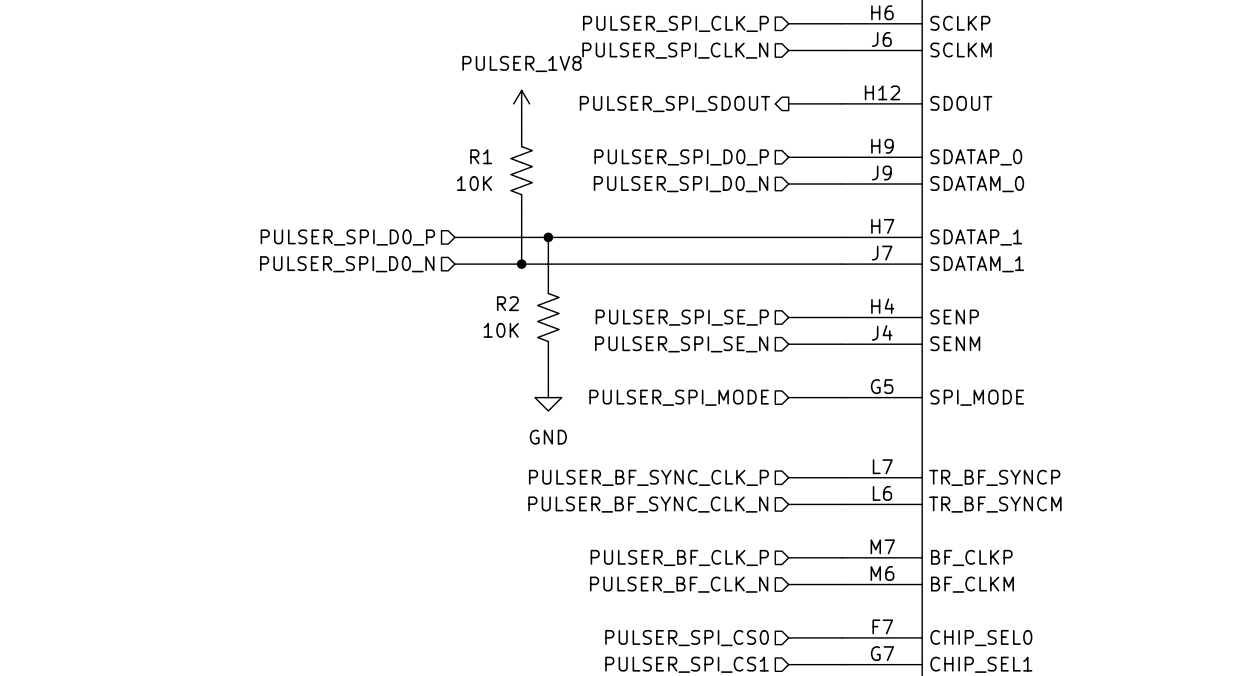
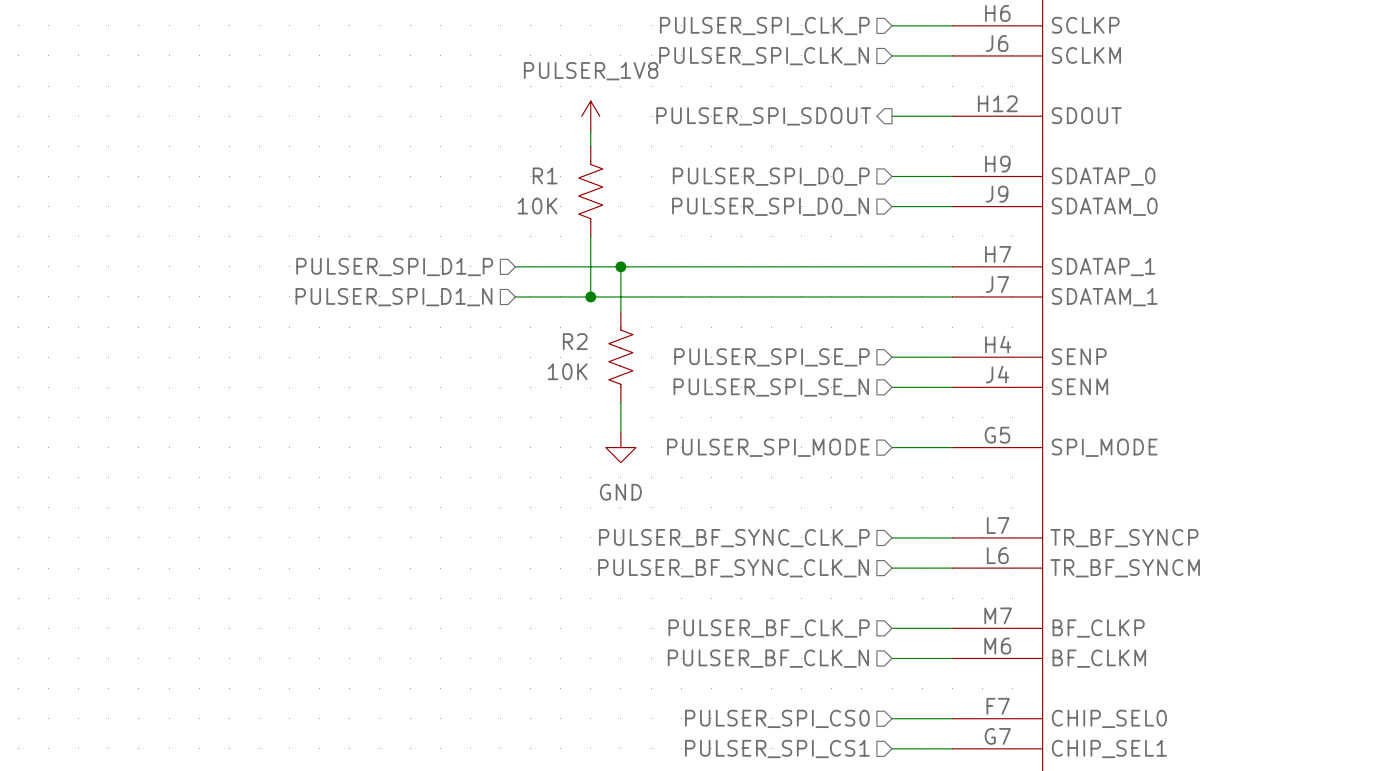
hierarchical label: PULSER_SPI_D0_P (347, 237) -> PULSER_SPI_D1_P (394, 267)
hierarchical label: PULSER_SPI_D0_N (347, 264) -> PULSER_SPI_D1_N (393, 297)

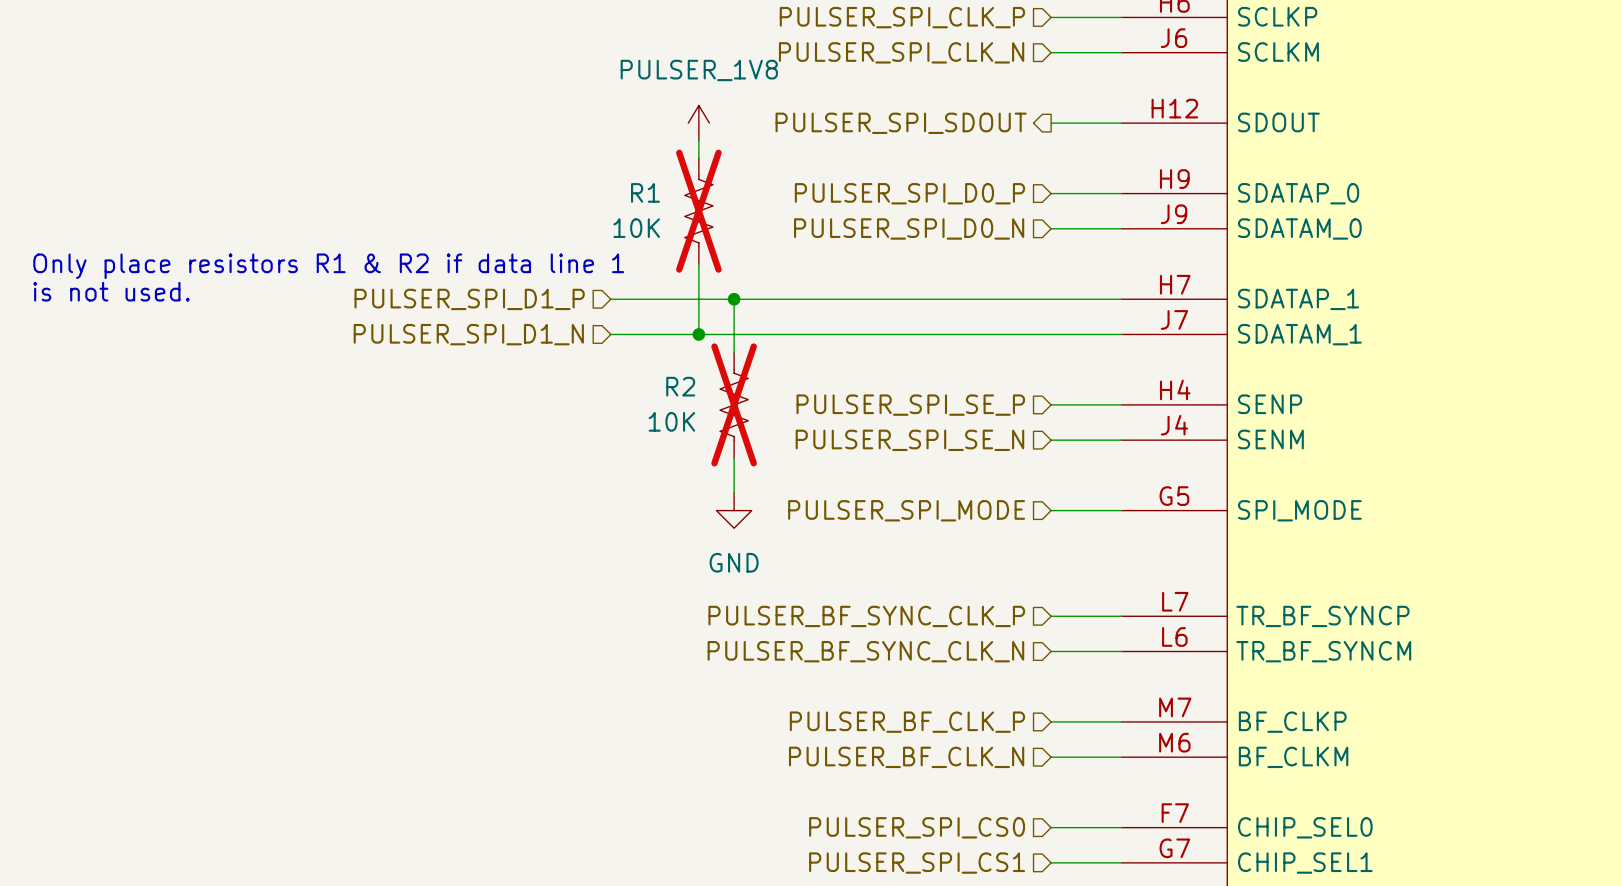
R1 do-not-place cross: none -> (698, 211)
text: none -> Only place resistors R1 & R2 if data line 1 (328, 266)
text: none -> is not used. (111, 291)
R2 do-not-place cross: none -> (734, 404)

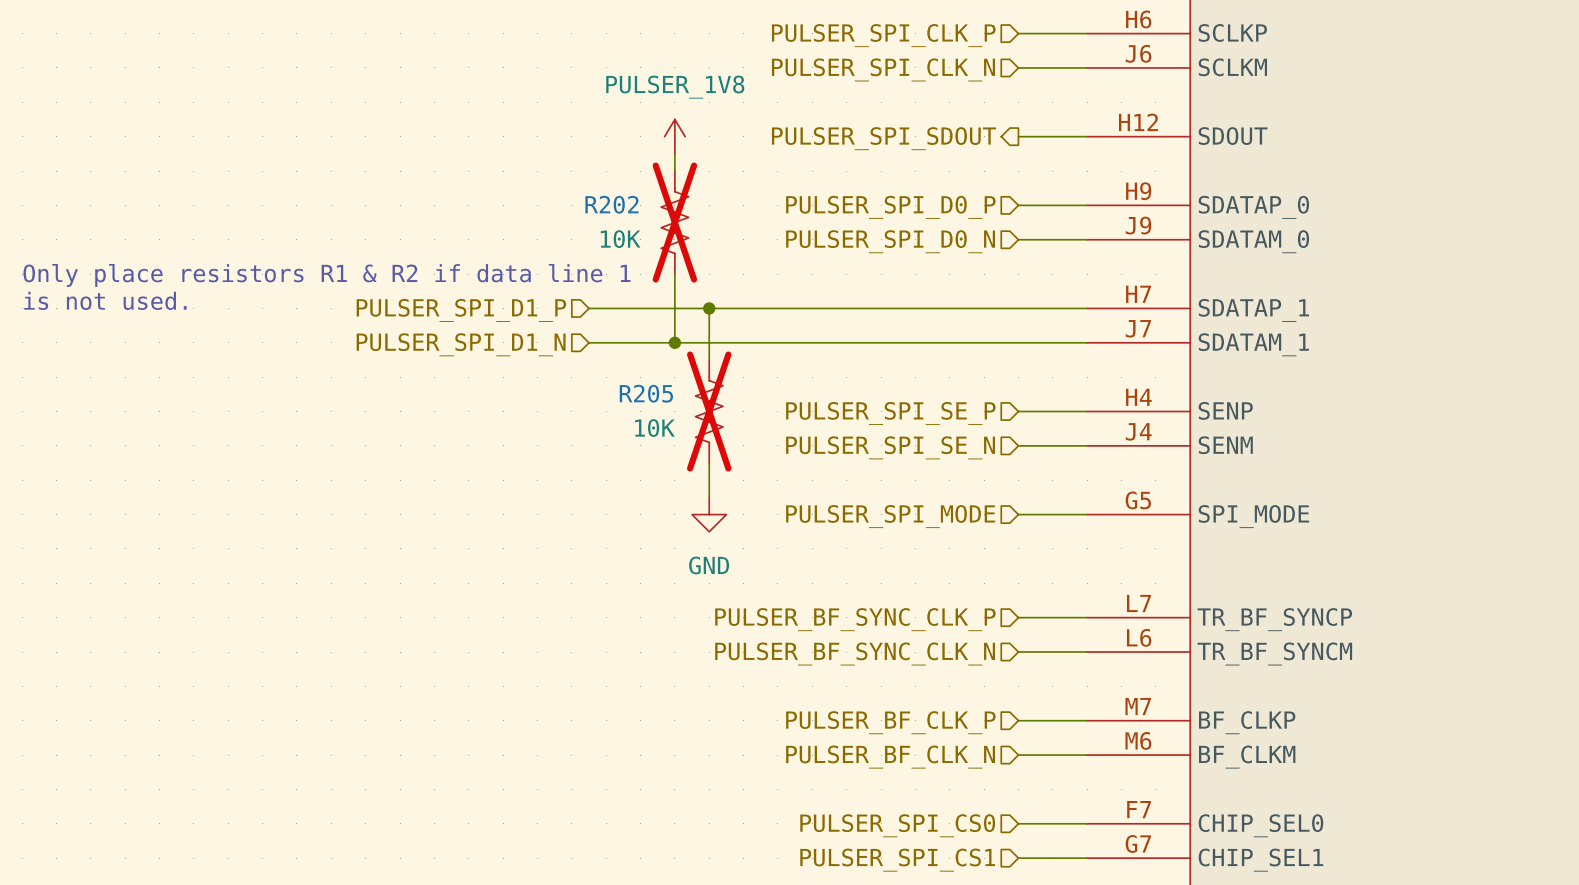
R1 name: R1 (645, 192) -> R202 (611, 204)
R2 name: R2 (680, 386) -> R205 (646, 393)

